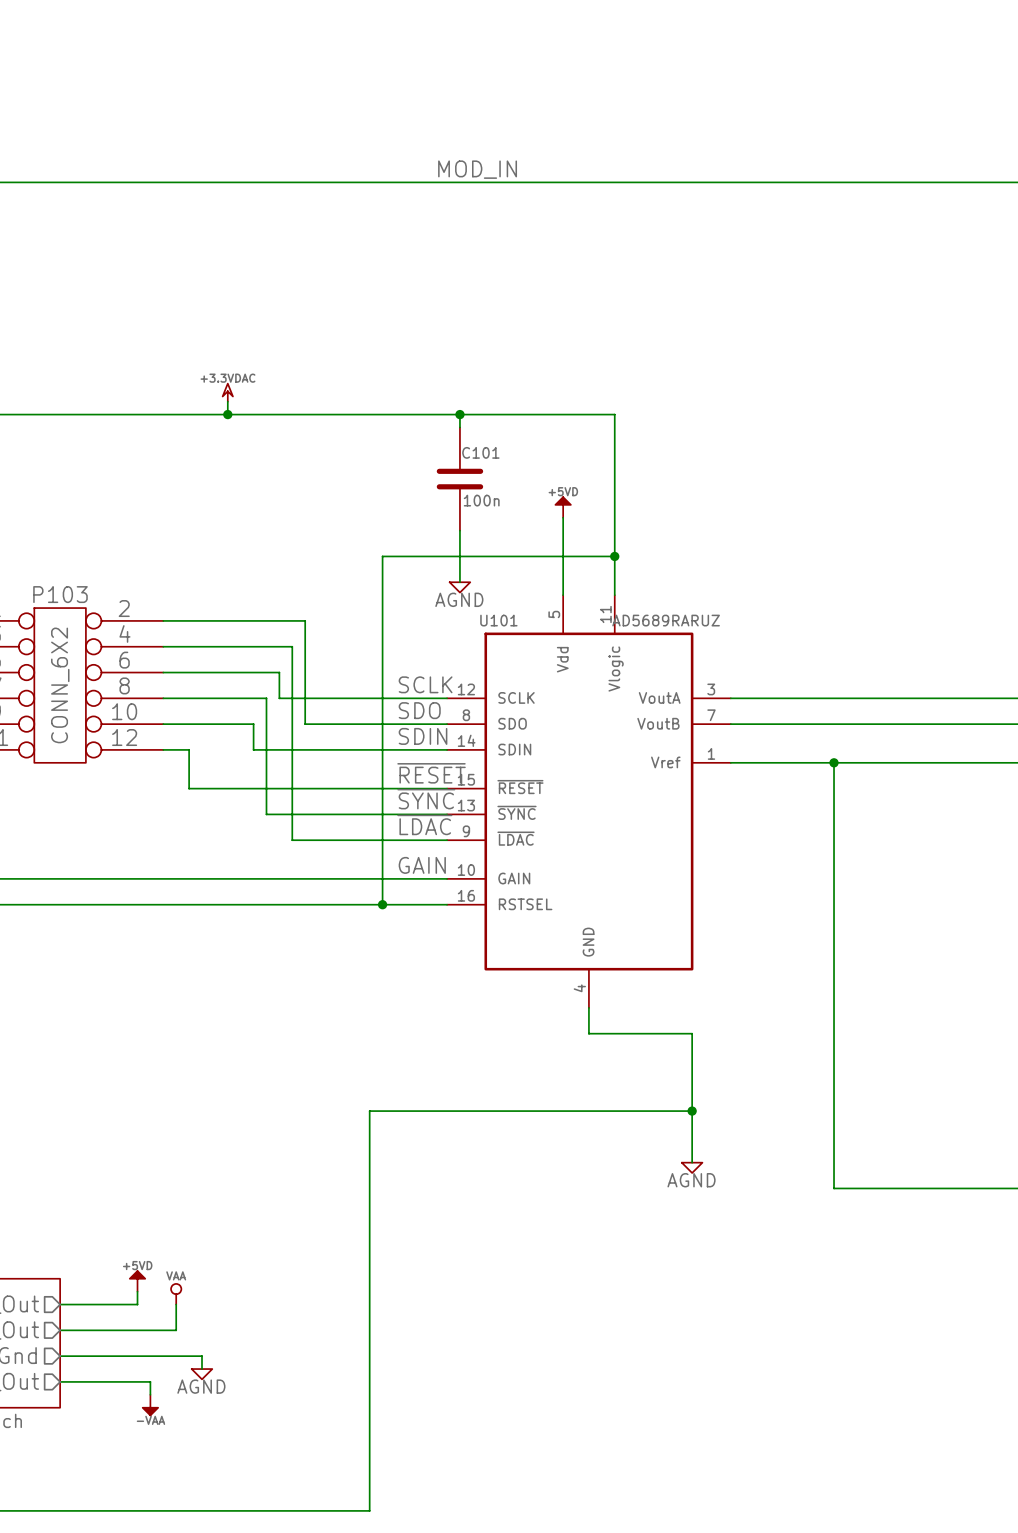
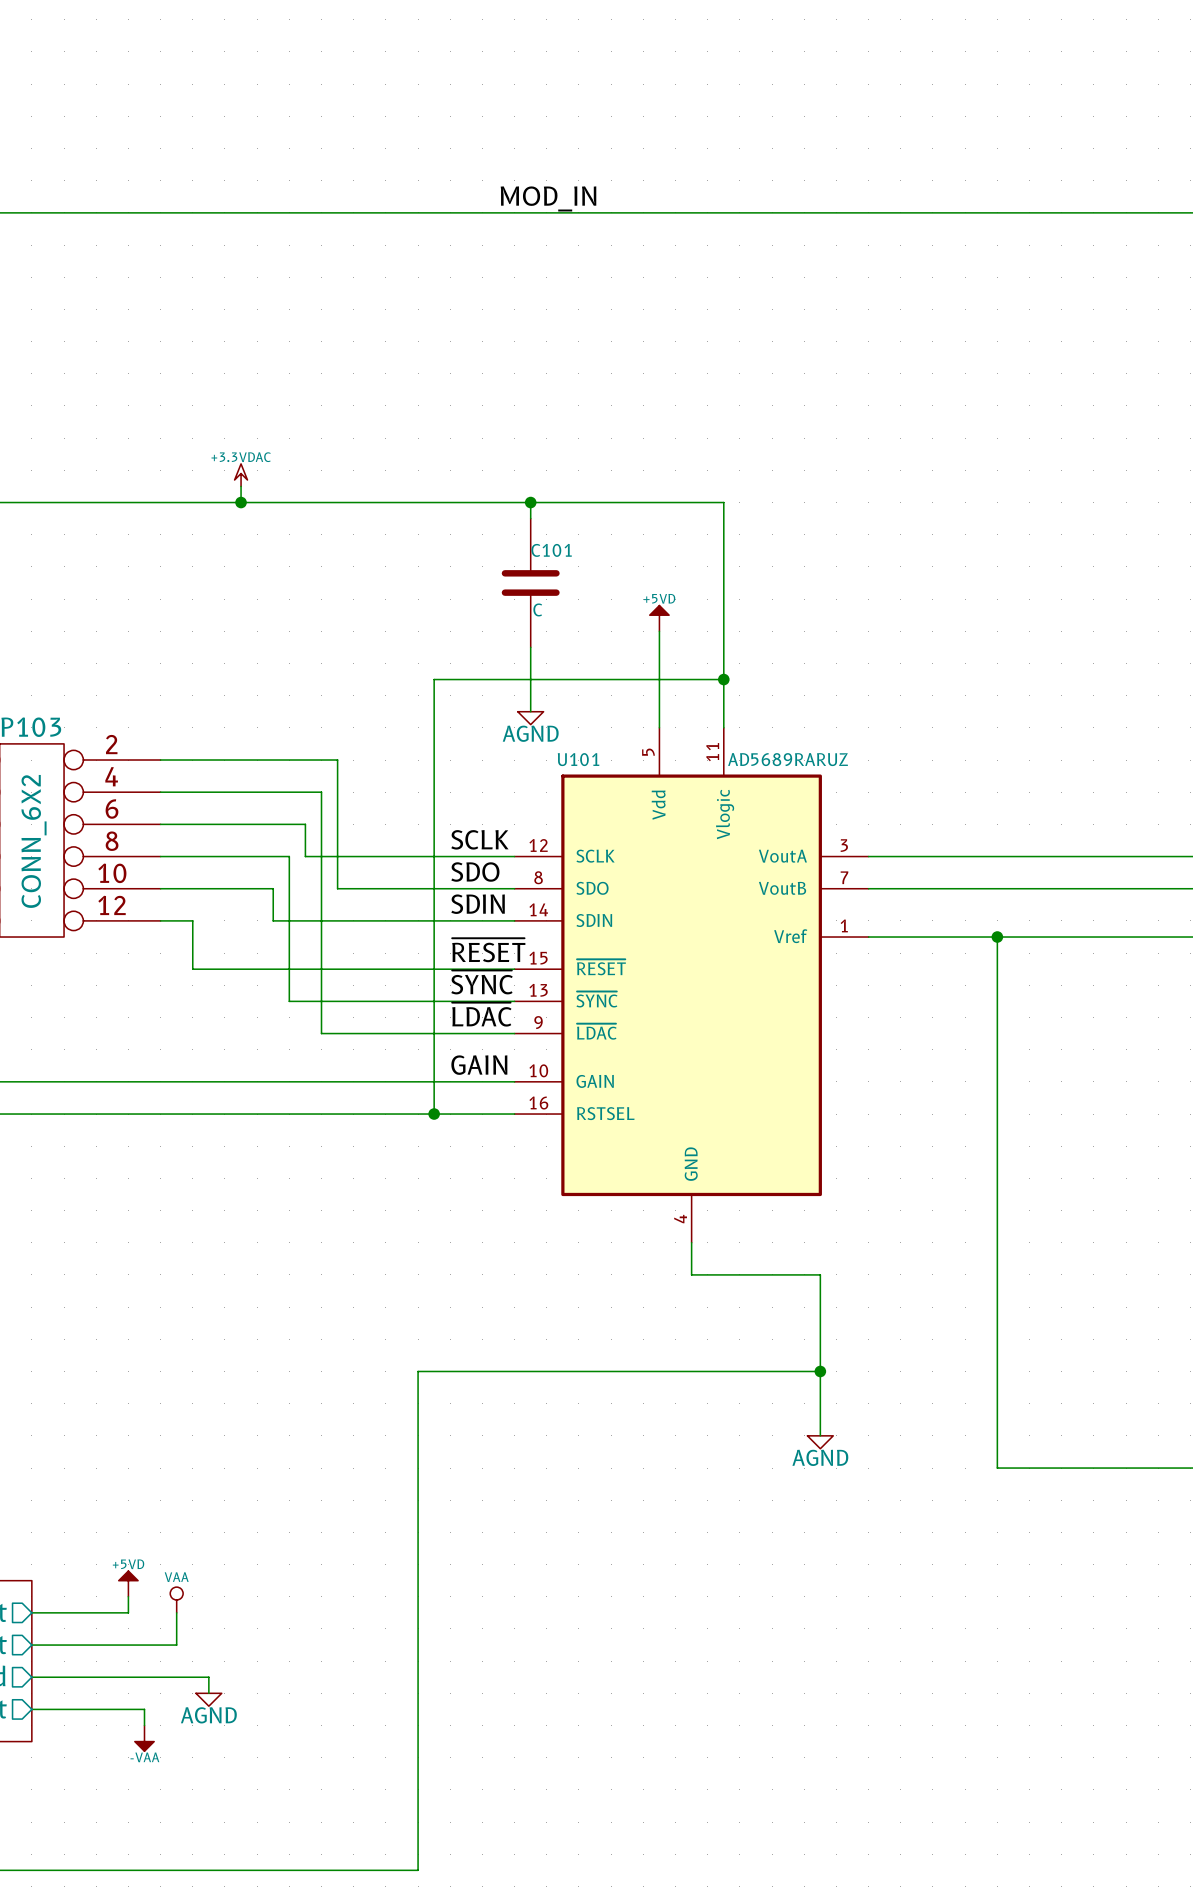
C101 value: 100n (481, 500) -> C (537, 609)

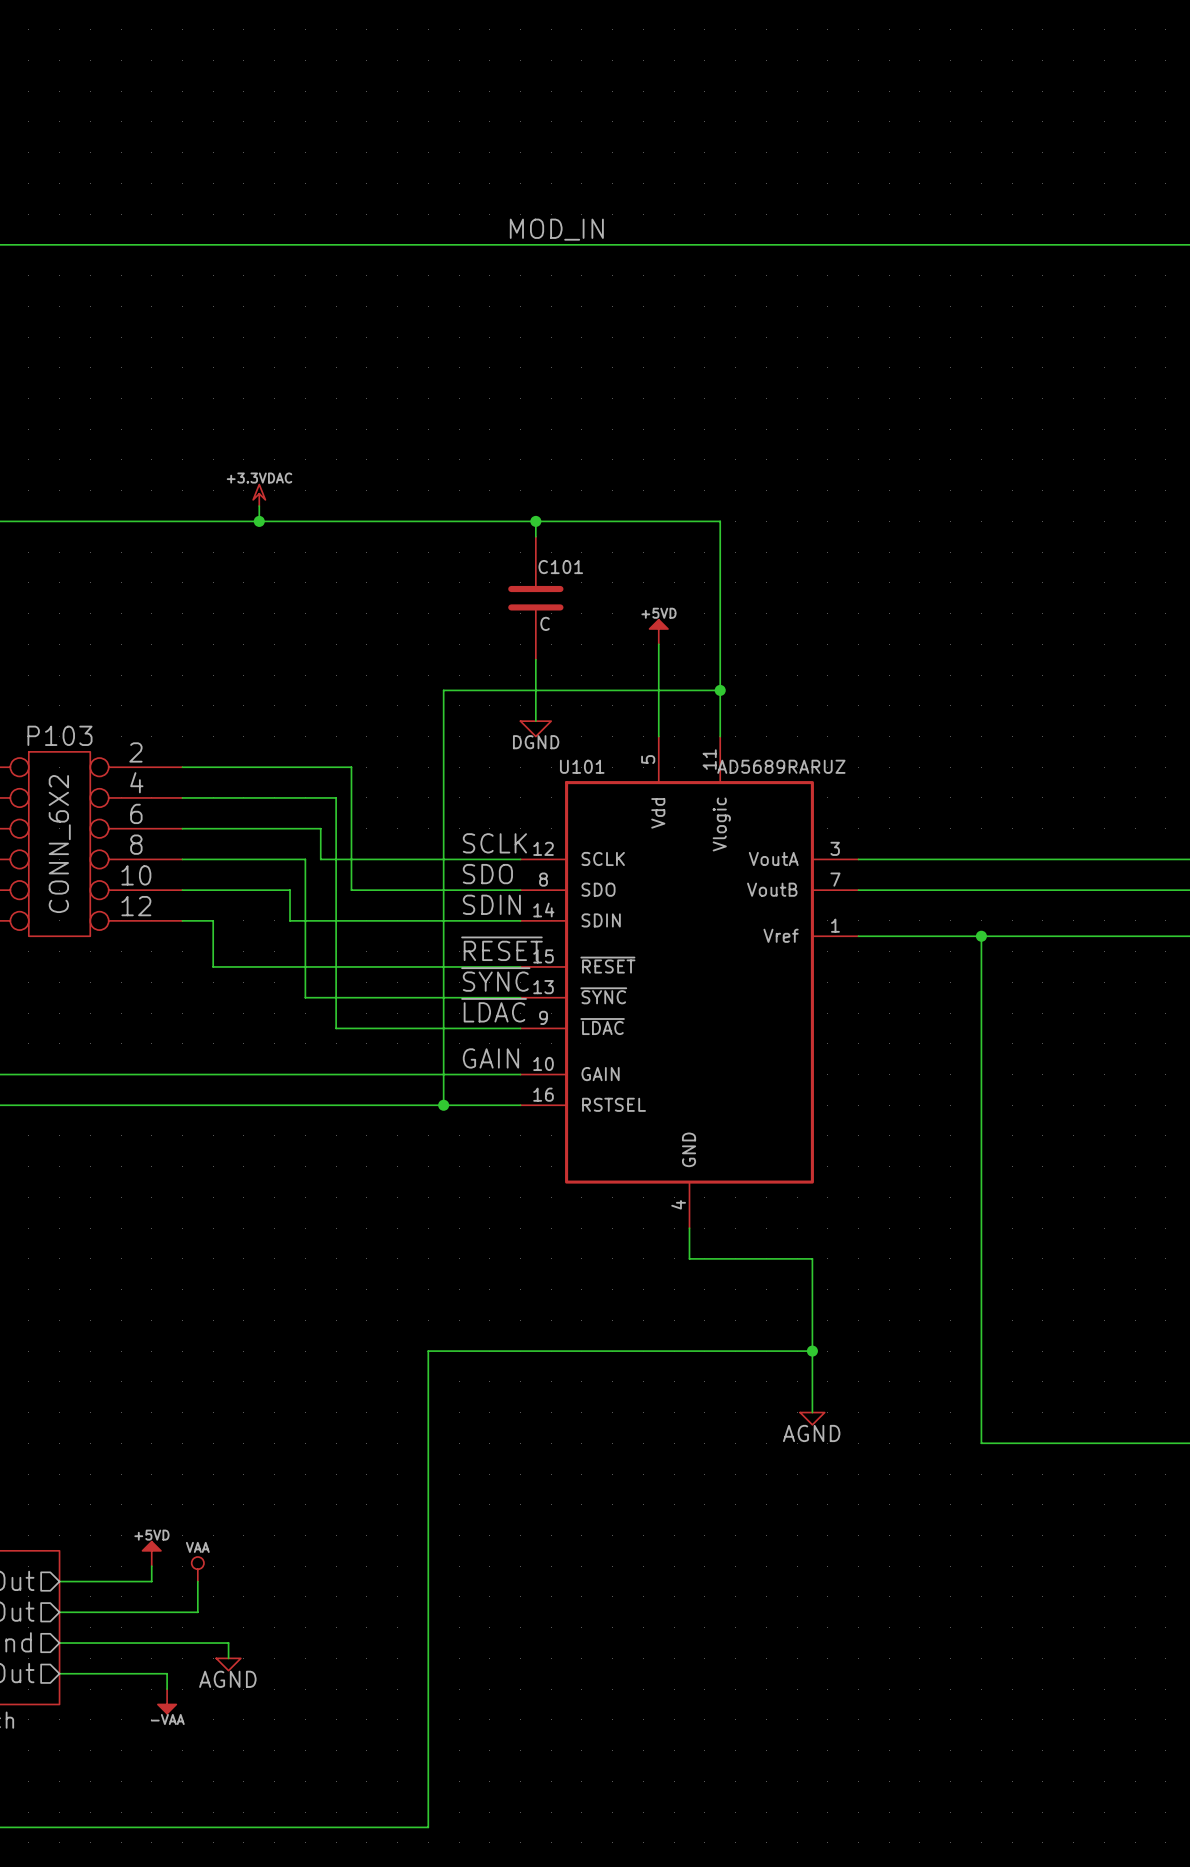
power symbol: AGND (530, 718) -> DGND (535, 728)

